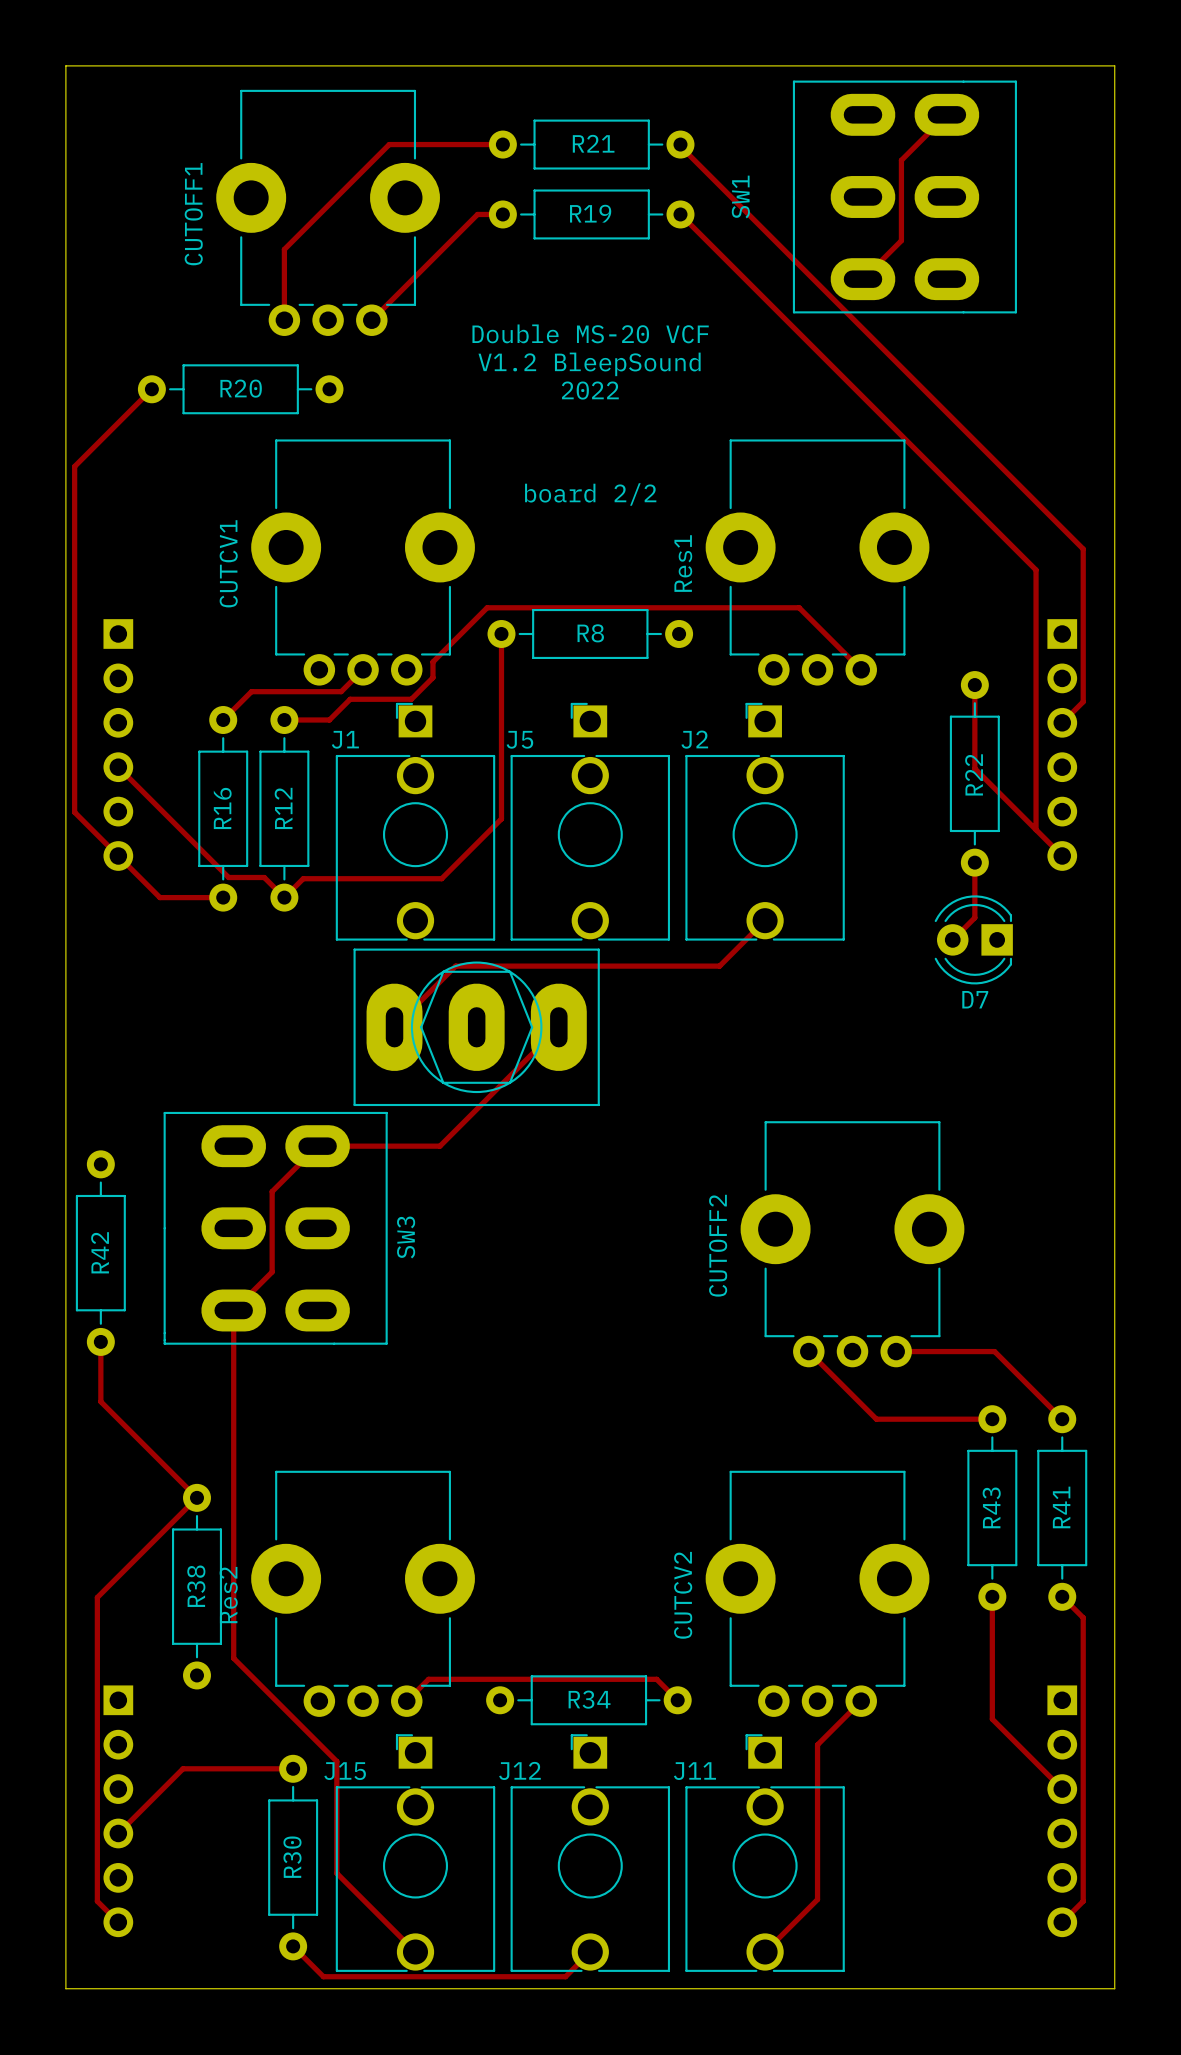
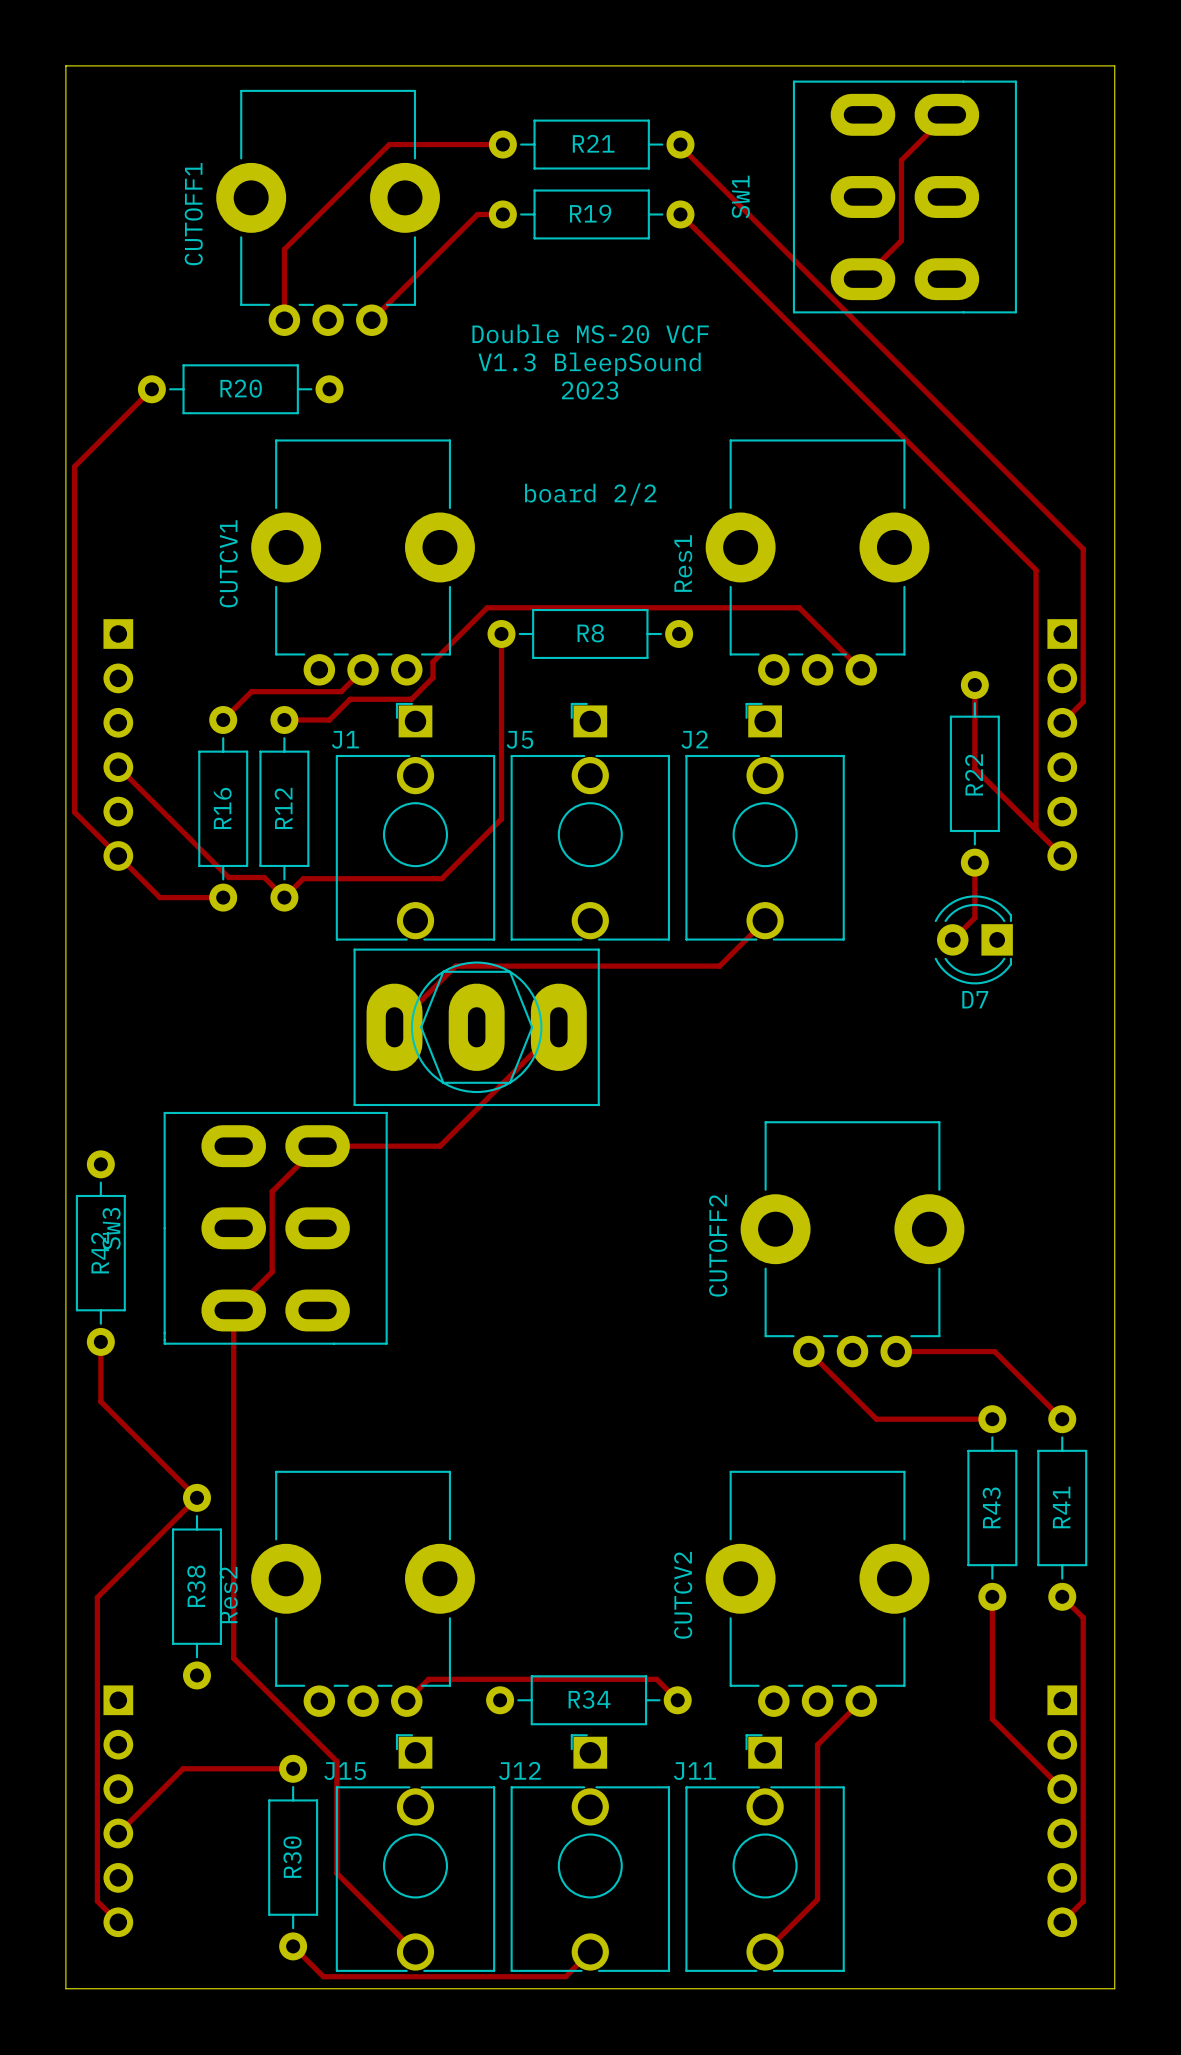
text: V1.2 BleepSound (589, 364) -> V1.3 BleepSound (589, 364)
text: 2022 (590, 390) -> 2023 (590, 390)
SW3 name position: SW3 (406, 1237) -> SW3 (111, 1228)

